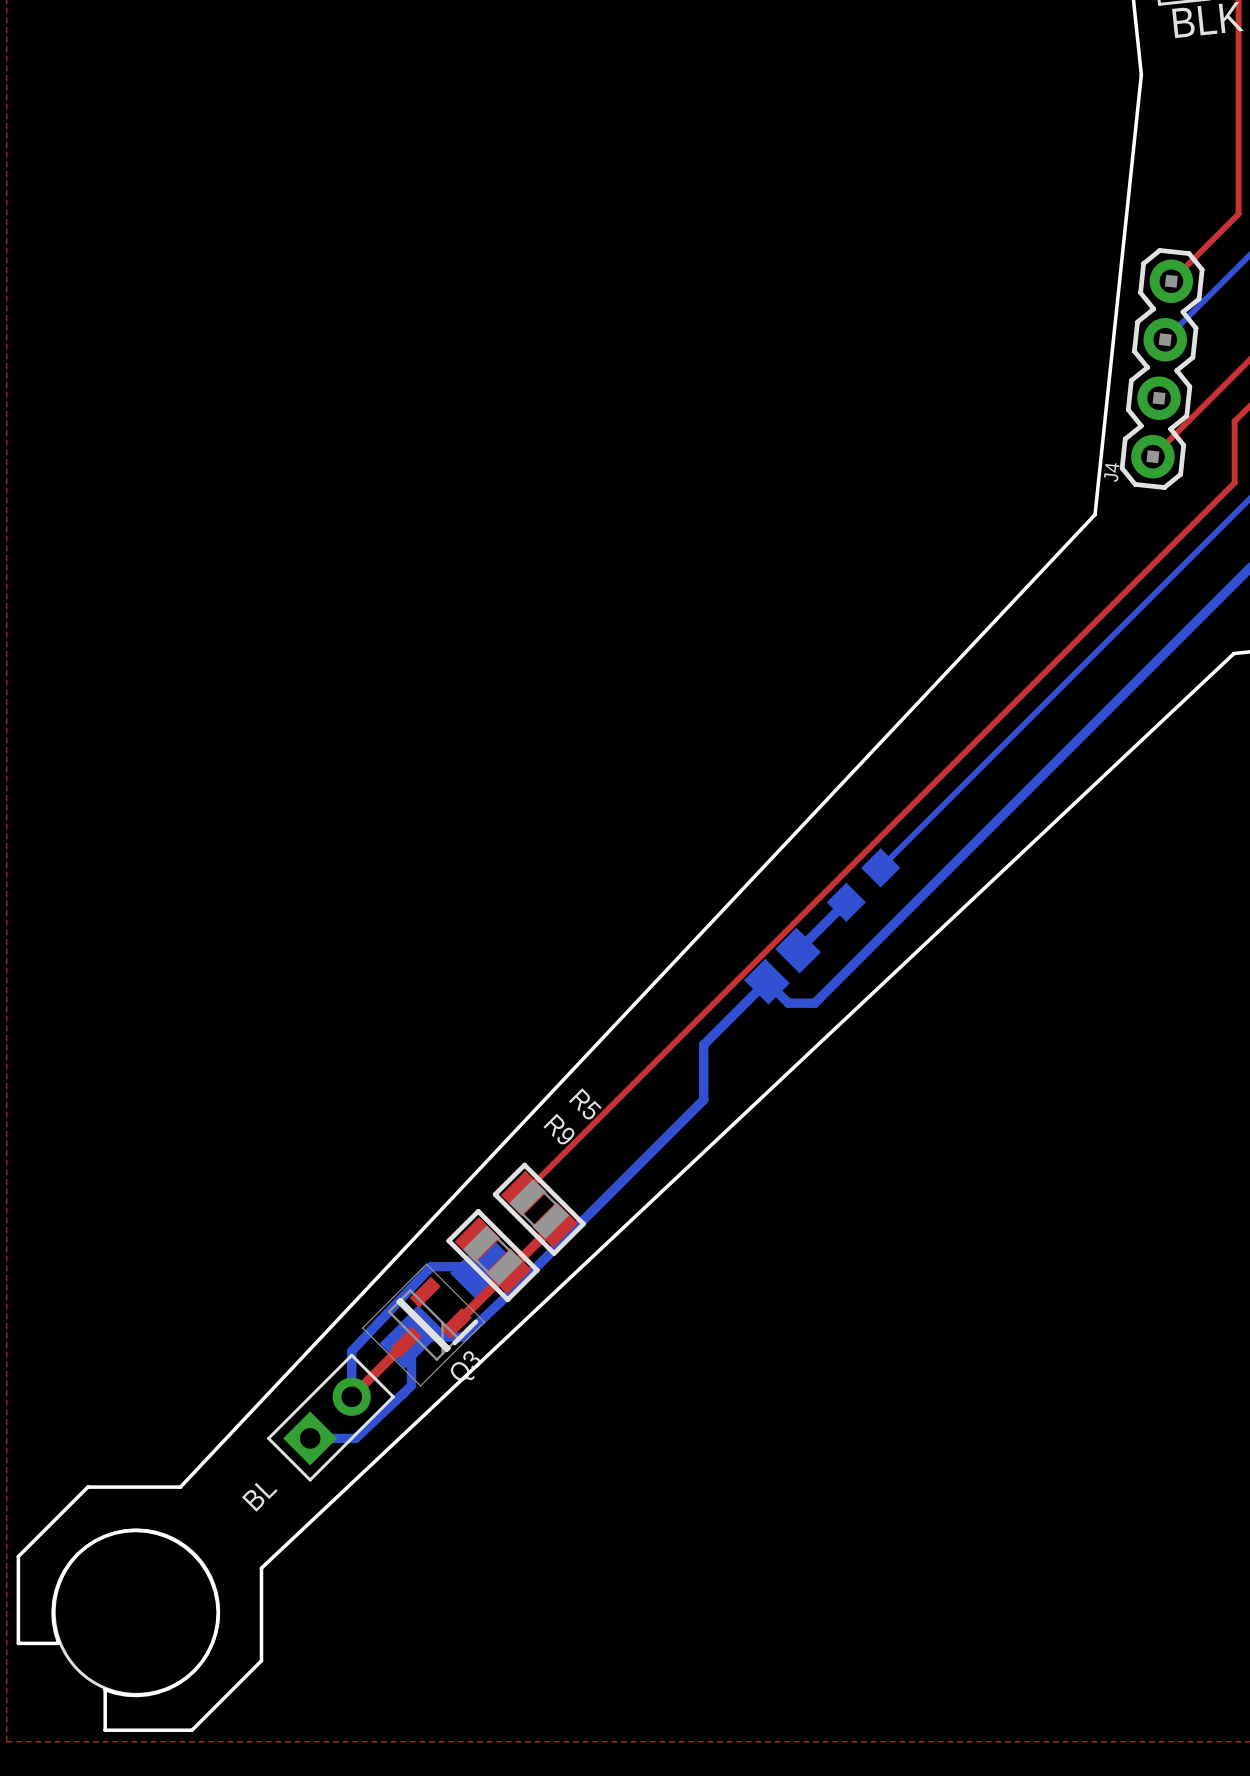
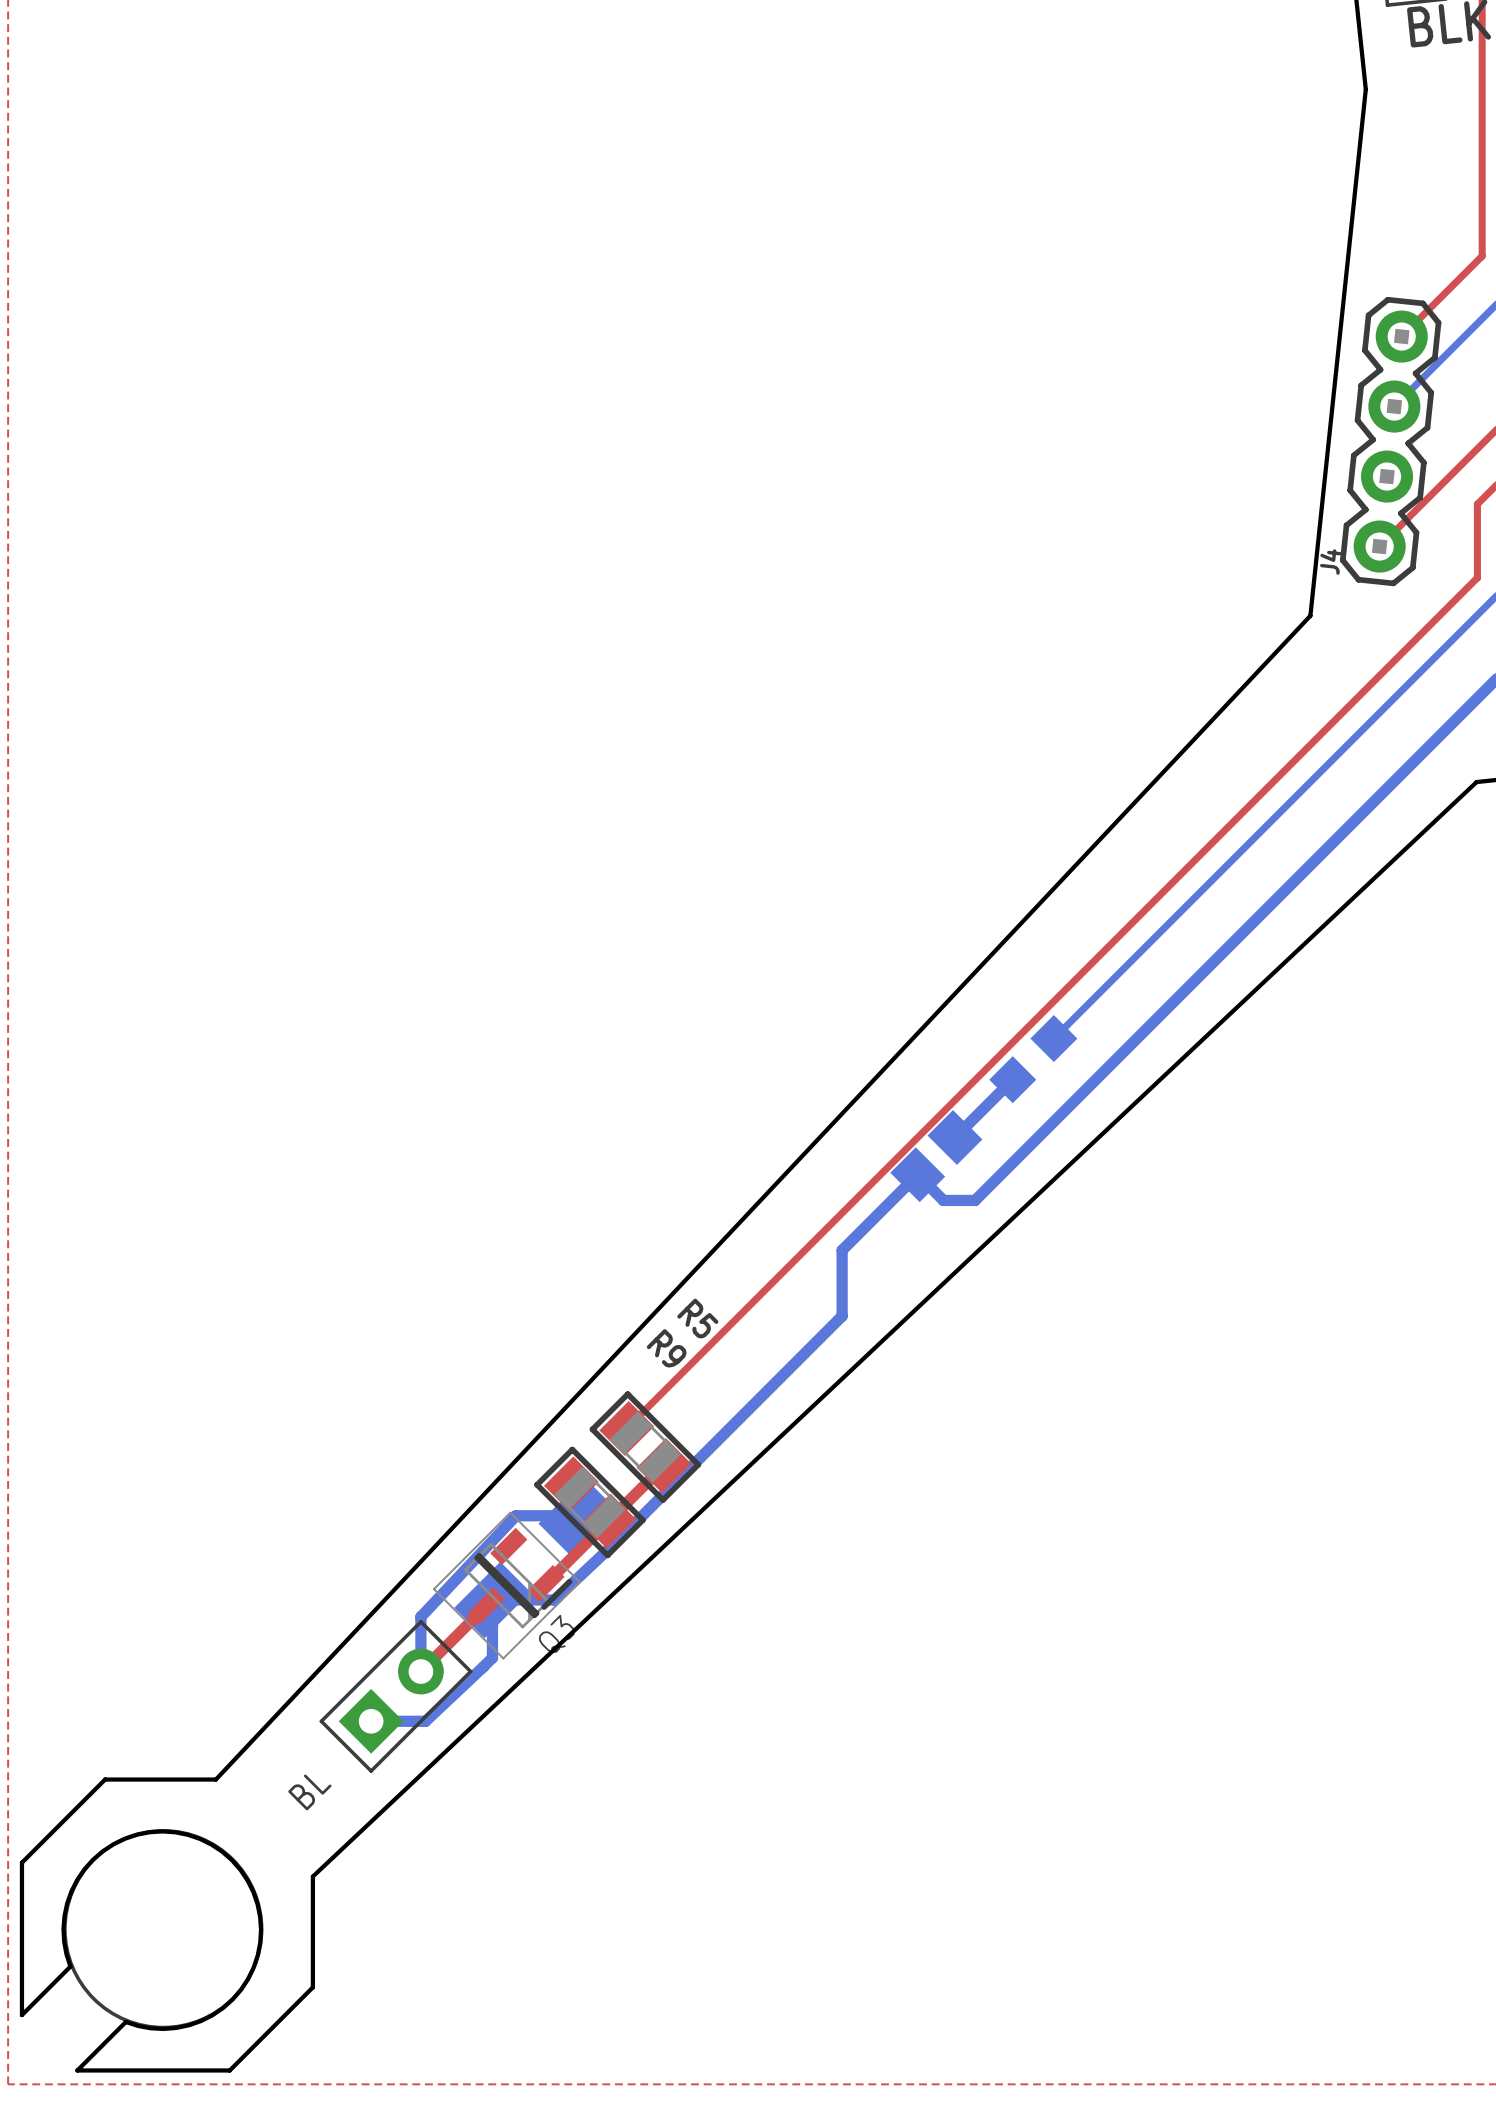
board edge: (18, 1643) (58, 1643) -> (21, 1966) (21, 2015) (70, 1966)
board edge: (105, 1689) (105, 1730) -> (125, 2021) (77, 2070) (125, 2070)

